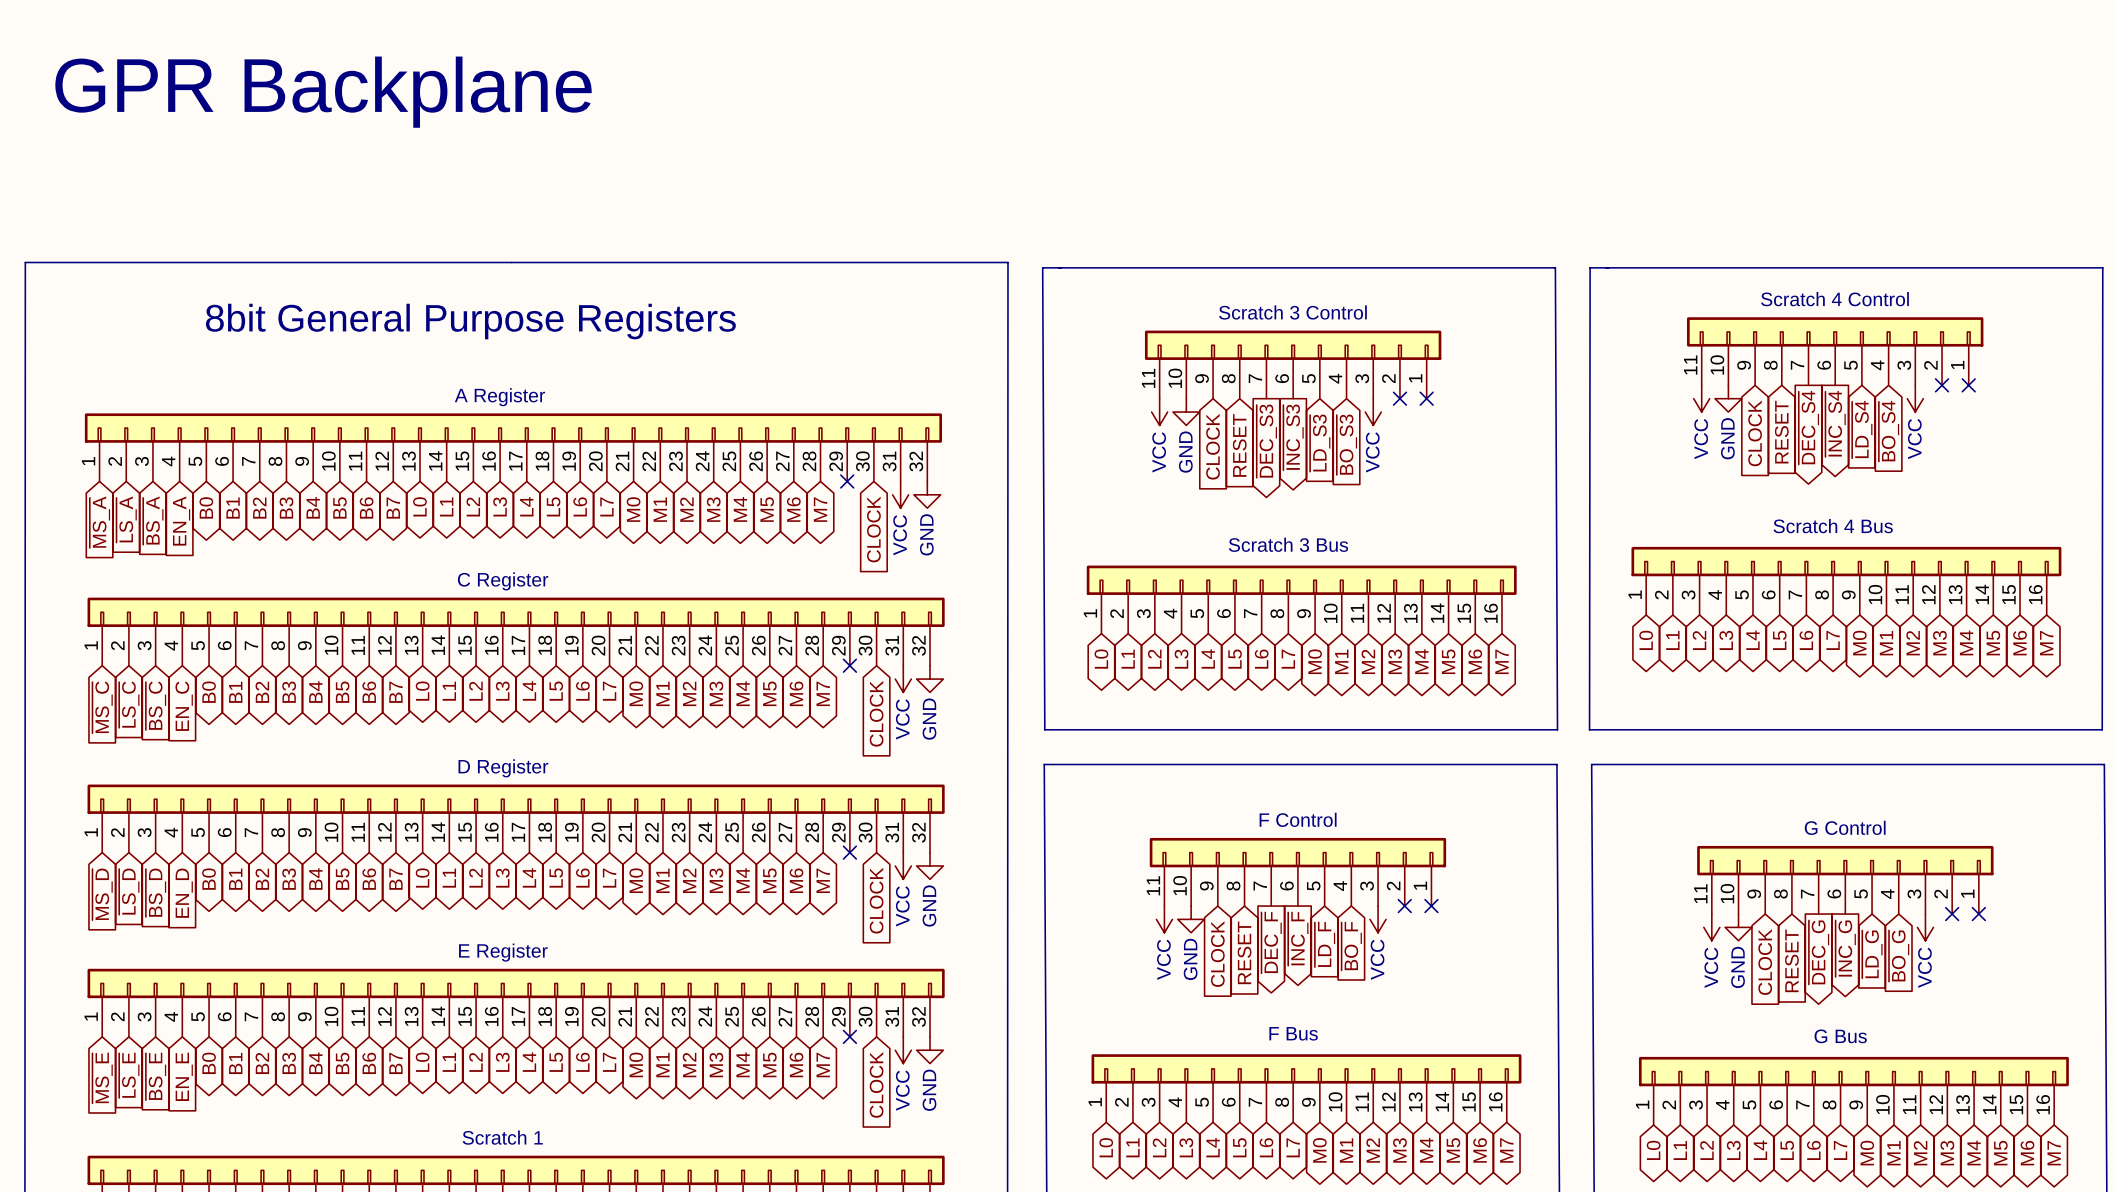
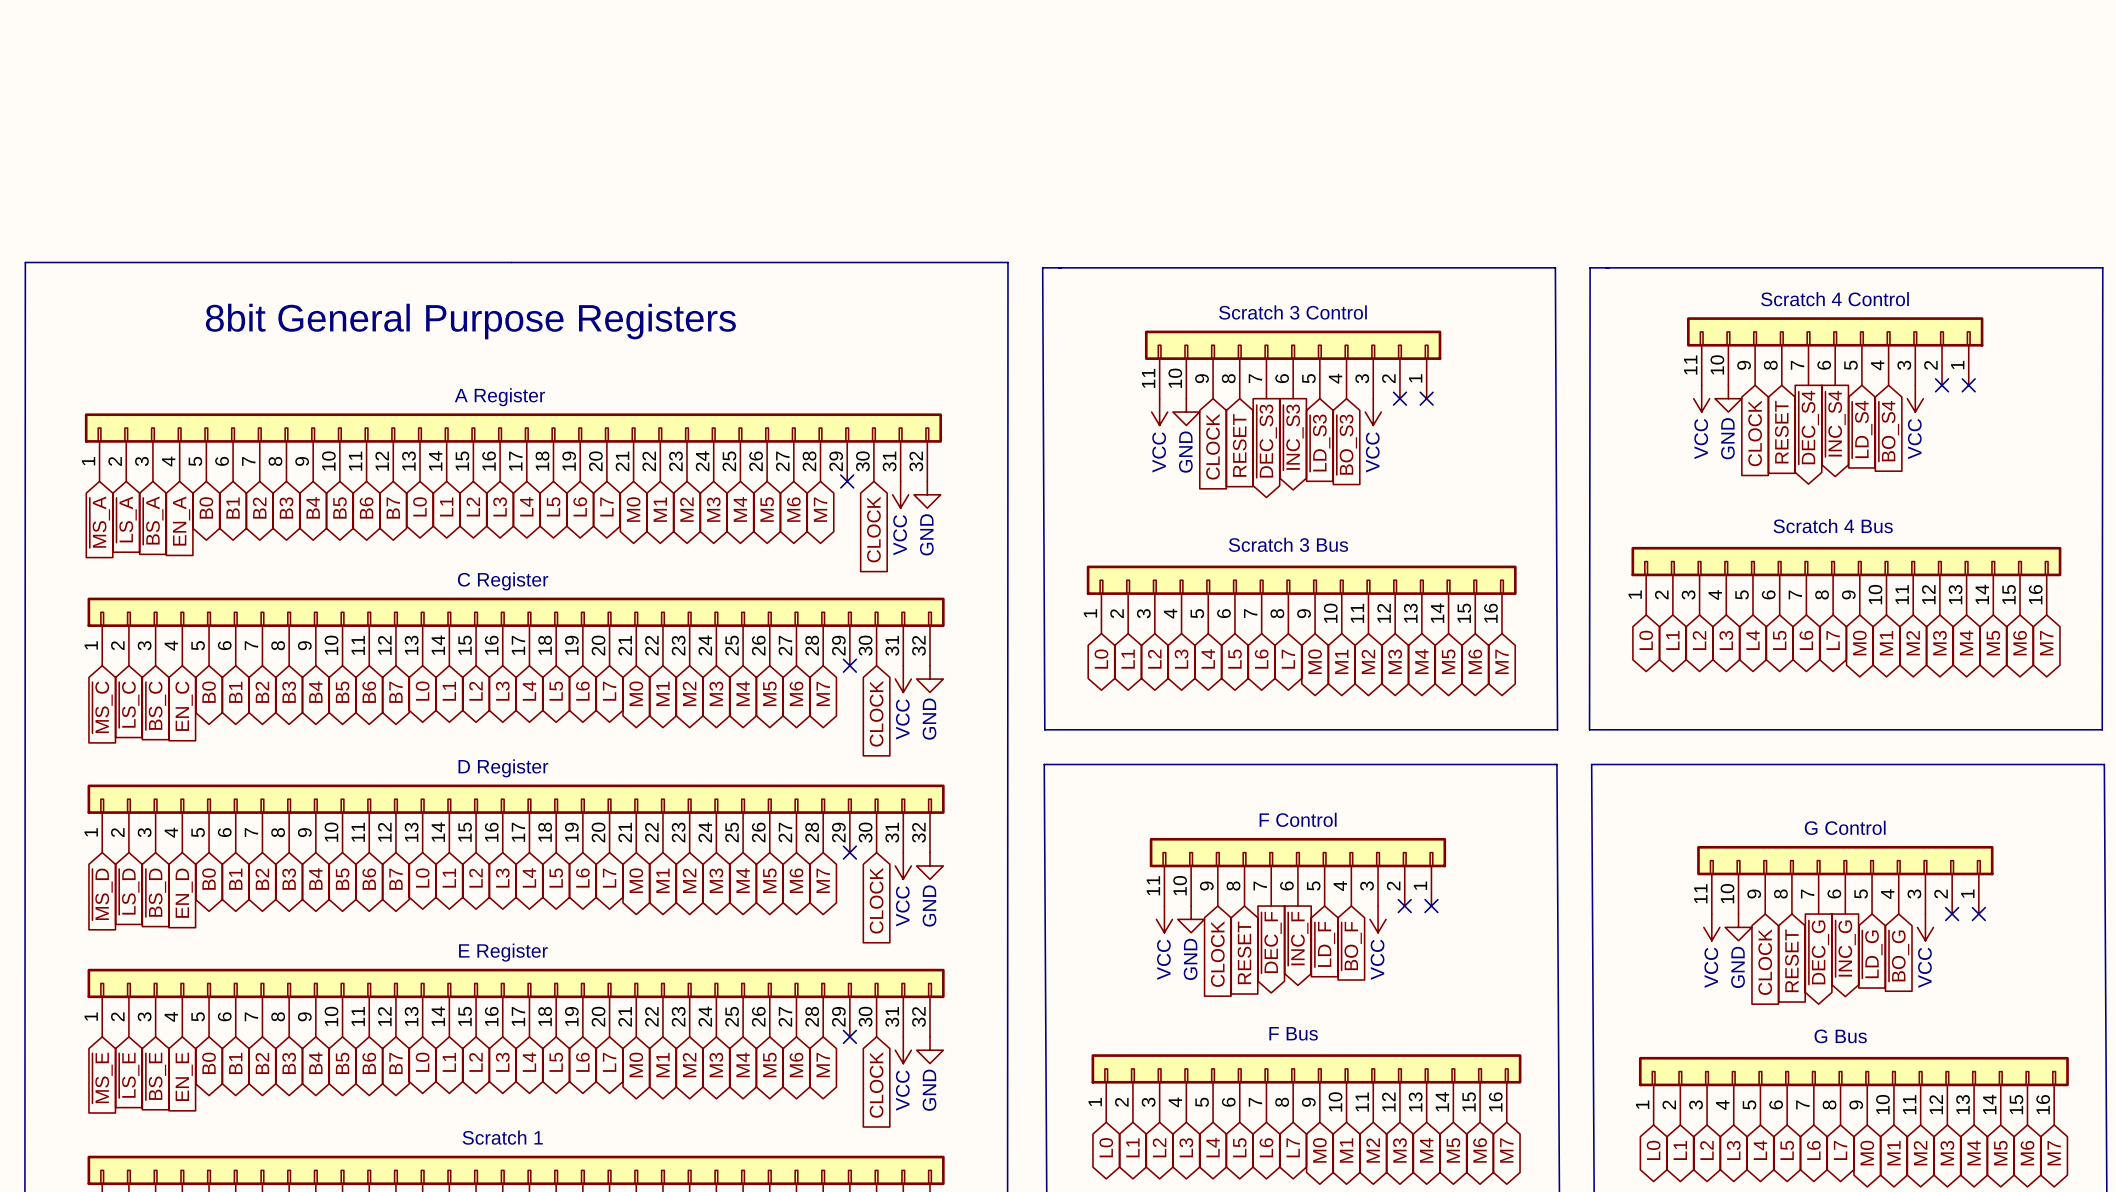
text: GPR Backplane (323, 92) -> none

